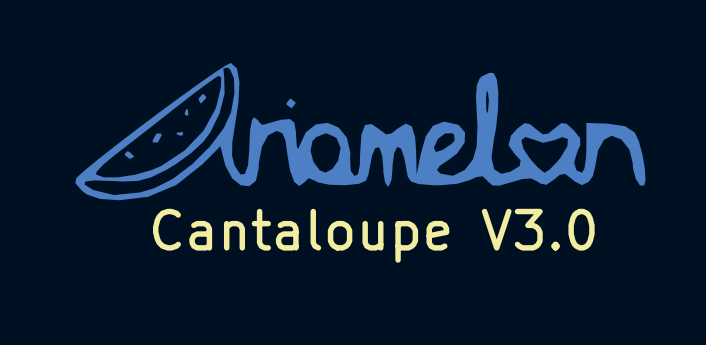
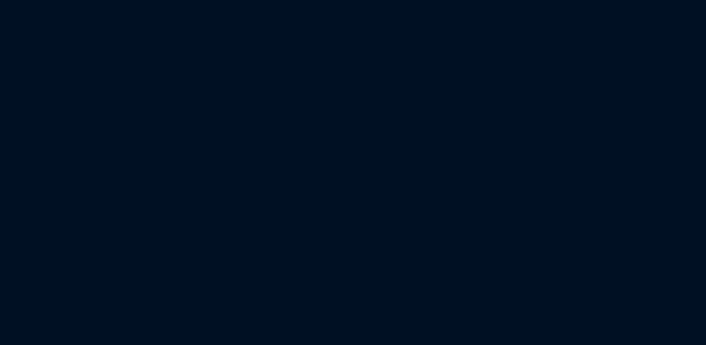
drawing: [75, 62, 646, 201] -> none
text: Cantaloupe V3.0 (373, 235) -> none

